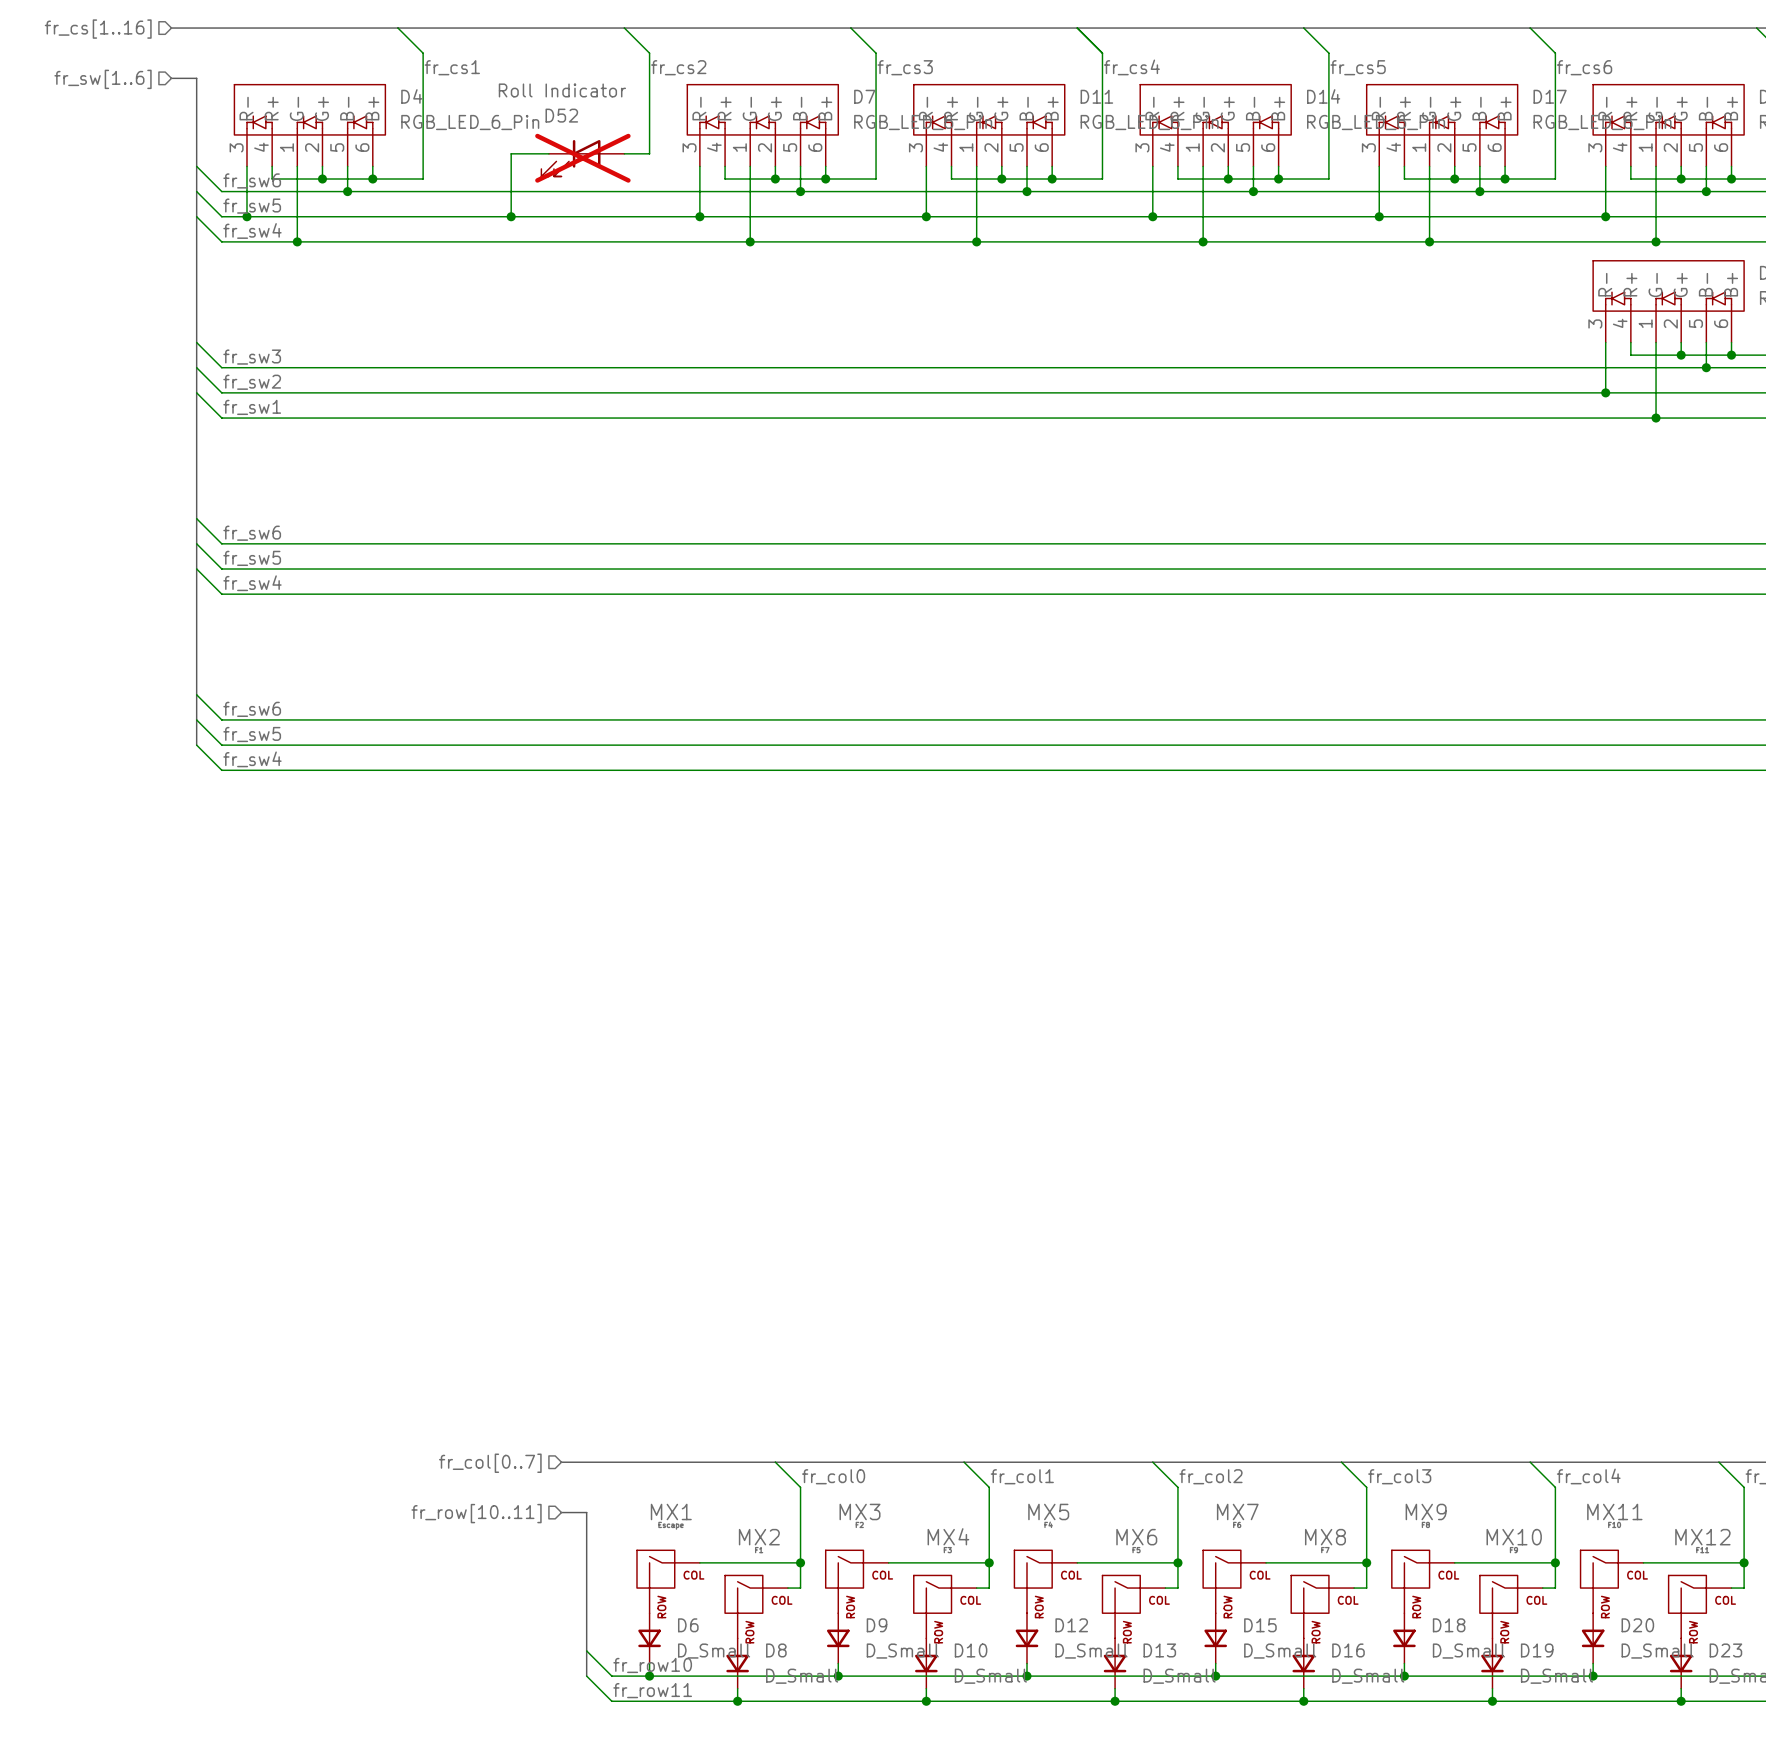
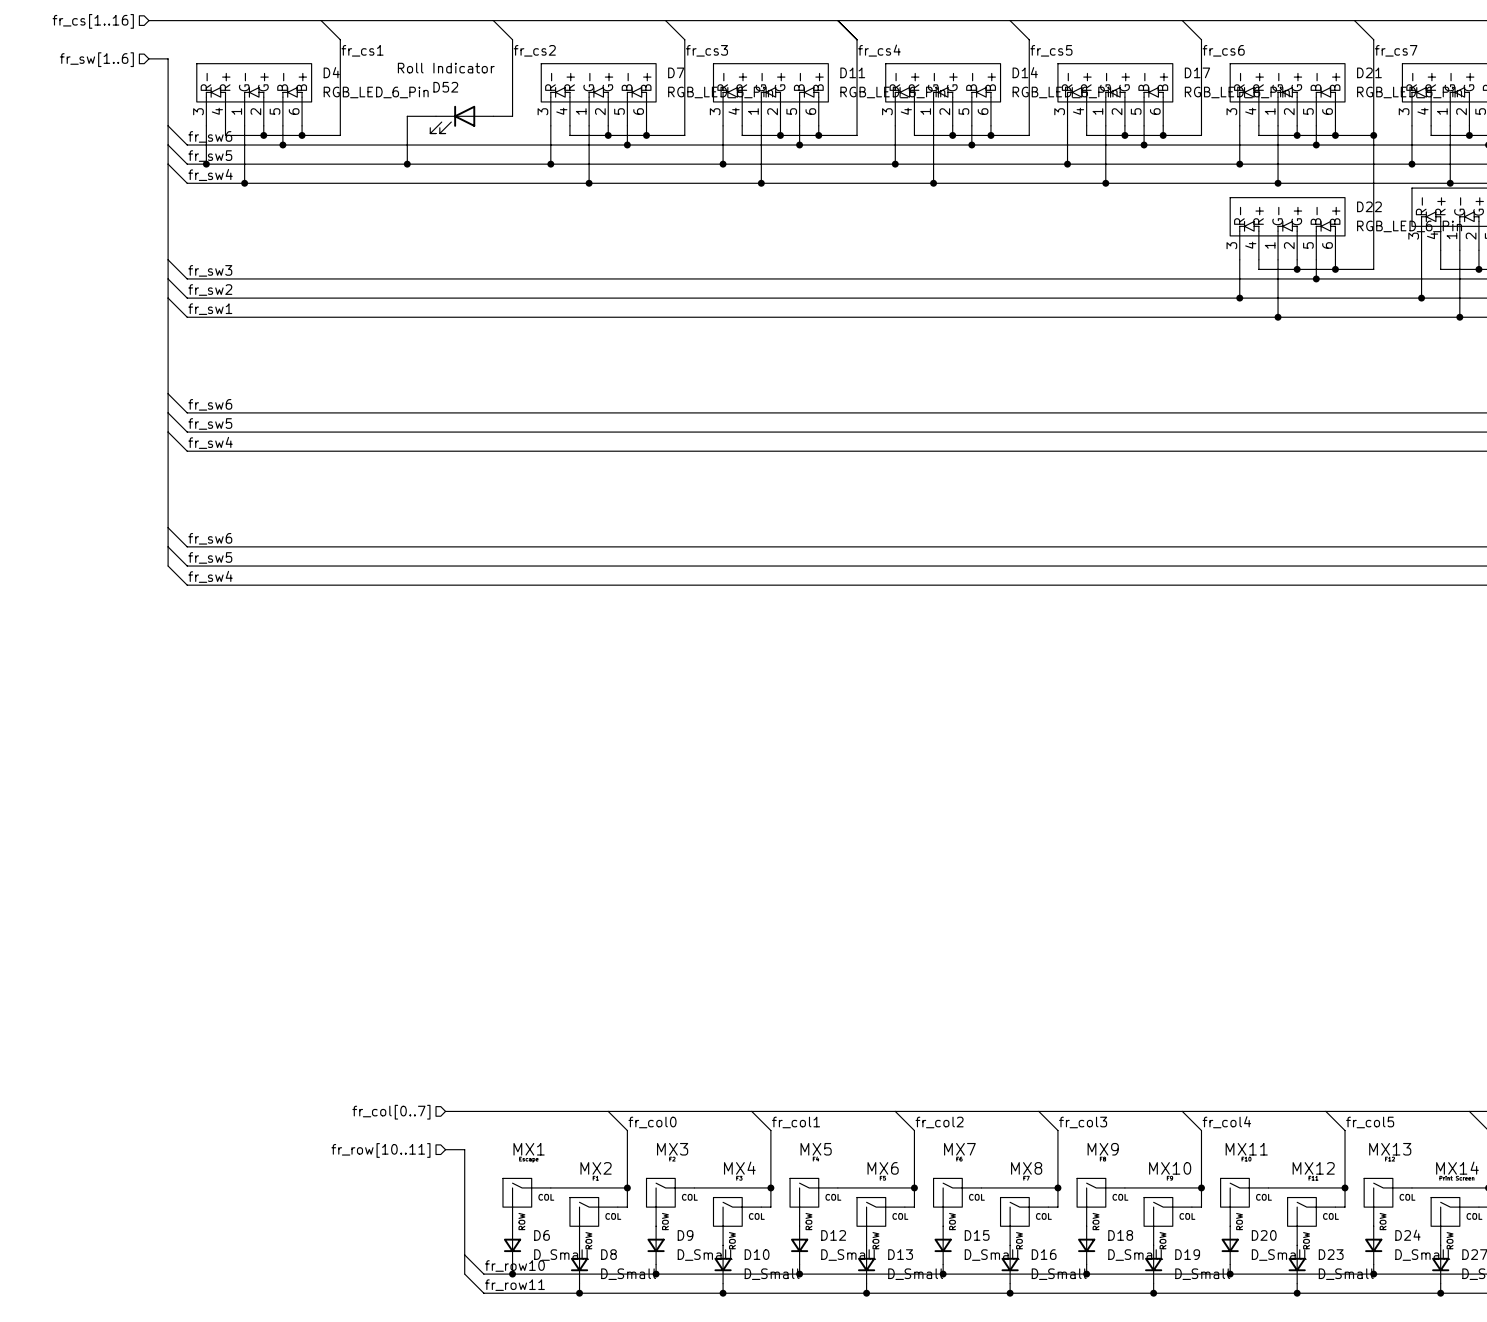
D52 do-not-place cross: (582, 158) -> none

